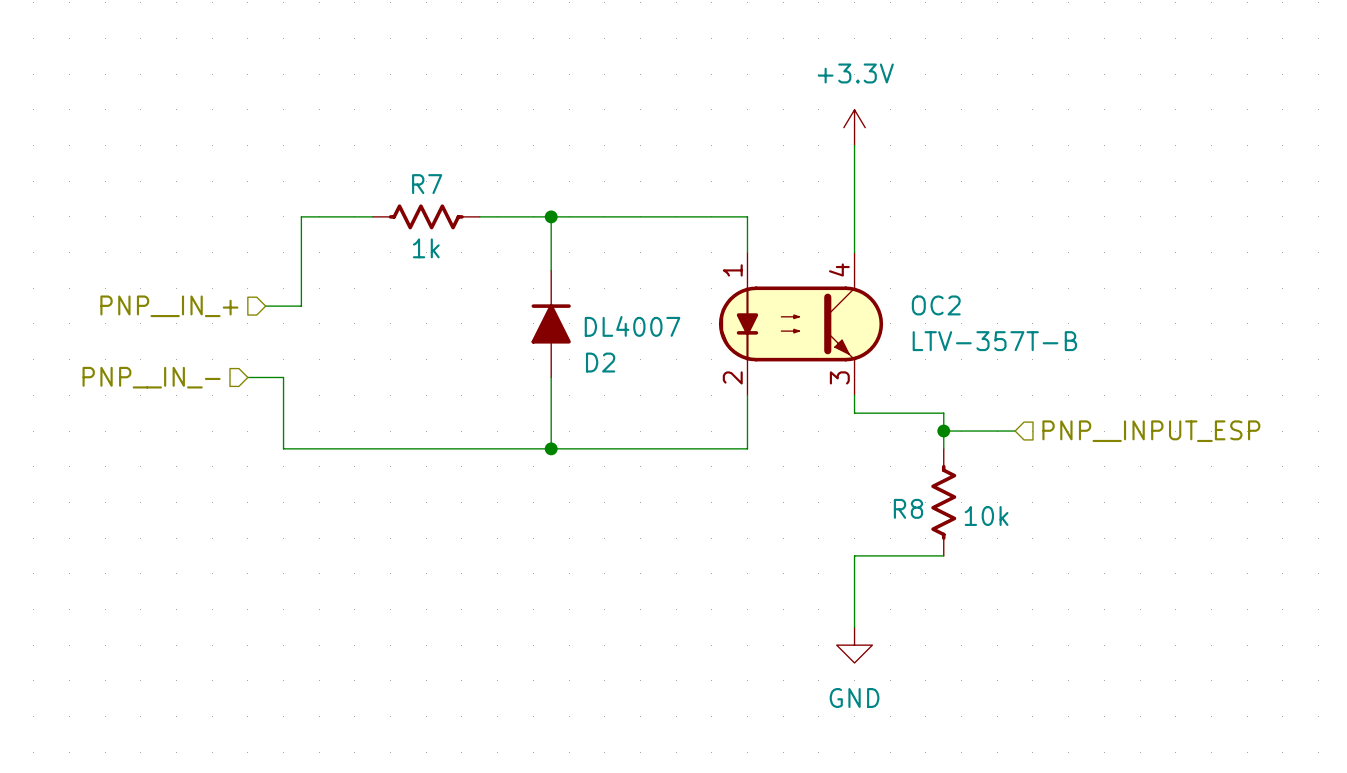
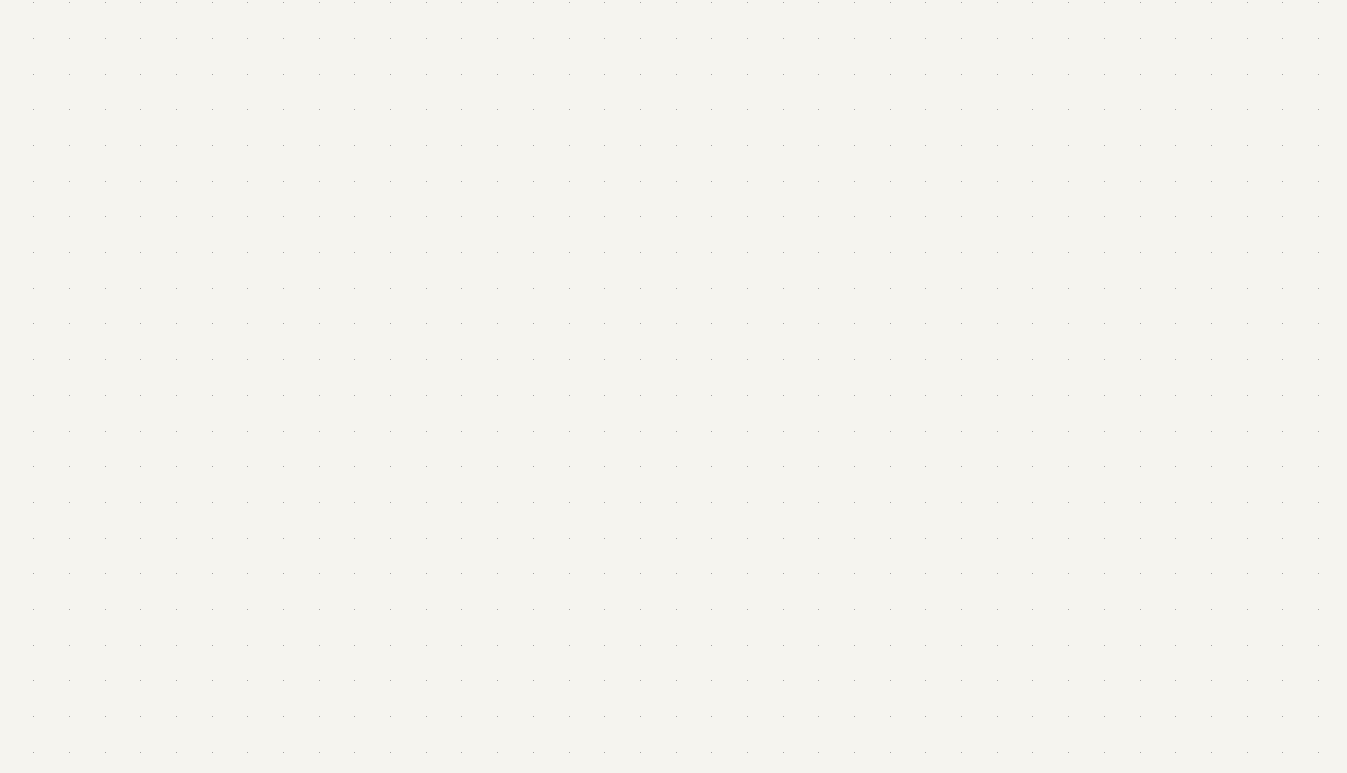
power symbol: +3.3V (854, 127) -> none
wire: (854, 145) (854, 252) -> none
wire: (372, 216) (301, 216) (301, 306) (265, 306) -> none
R7: (426, 216) -> none
wire: (479, 216) (747, 216) (747, 252) -> none
wire: (551, 216) (551, 270) -> none
junction: (551, 216) -> none
hierarchical label: PNP__IN_+ (169, 306) -> none
D2: DL4007 (551, 323) -> none
OC2: LTV-357T-B (801, 323) -> none
hierarchical label: PNP__IN_- (151, 377) -> none
wire: (247, 377) (283, 377) (283, 448) (747, 448) (747, 395) -> none
wire: (551, 377) (551, 448) -> none
wire: (854, 395) (854, 413) (943, 413) (943, 448) -> none
wire: (943, 431) (1015, 431) -> none
junction: (943, 431) -> none
hierarchical label: PNP__INPUT_ESP (1151, 431) -> none
junction: (551, 448) -> none
R8: (943, 502) -> none
wire: (943, 555) (854, 555) (854, 627) -> none
power symbol: GND (854, 645) -> none

